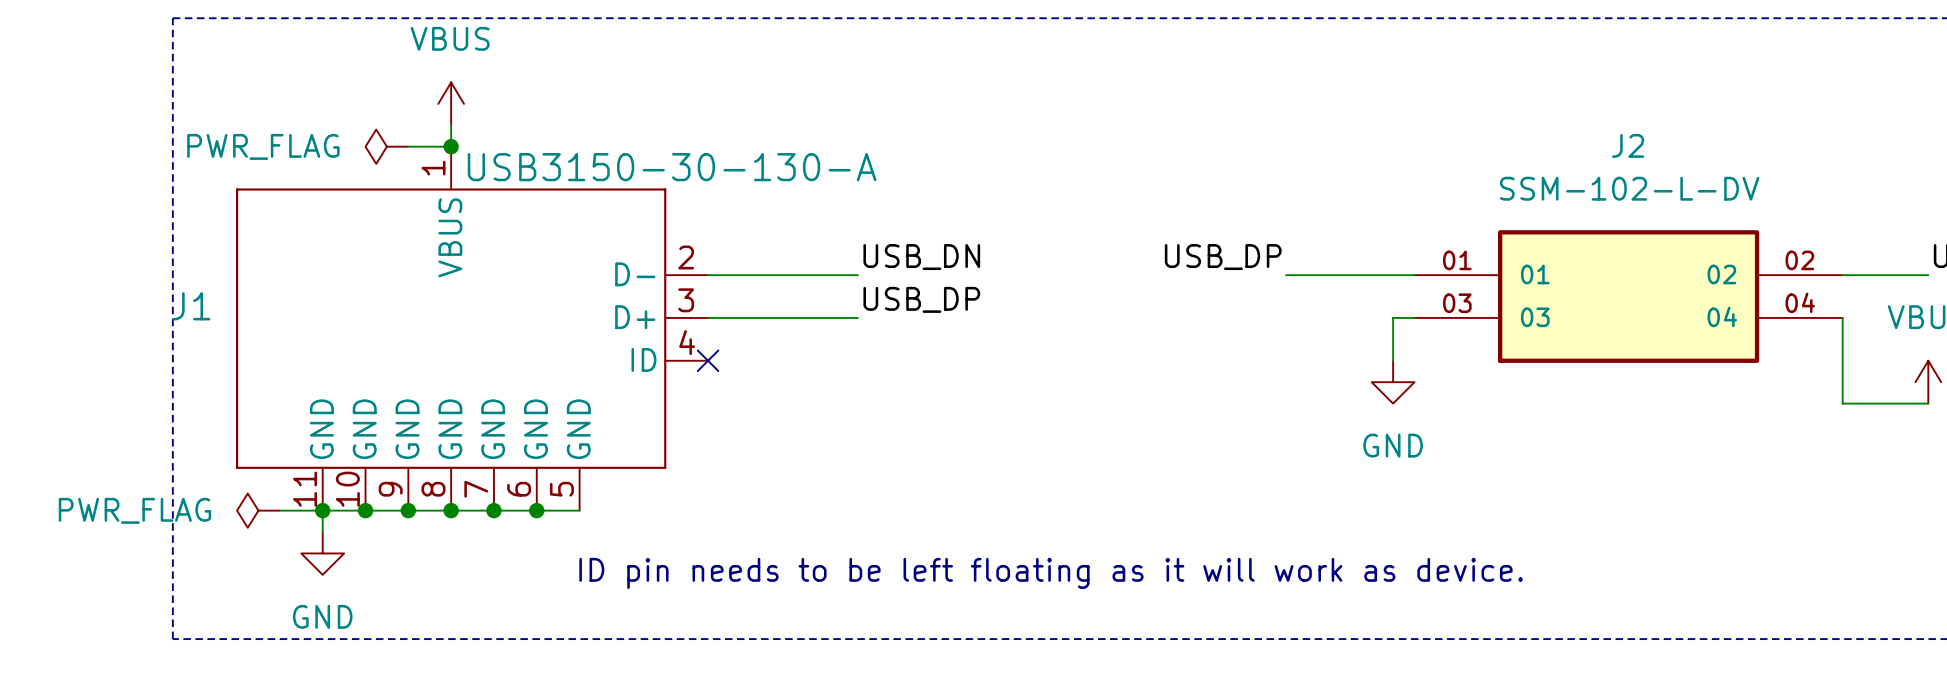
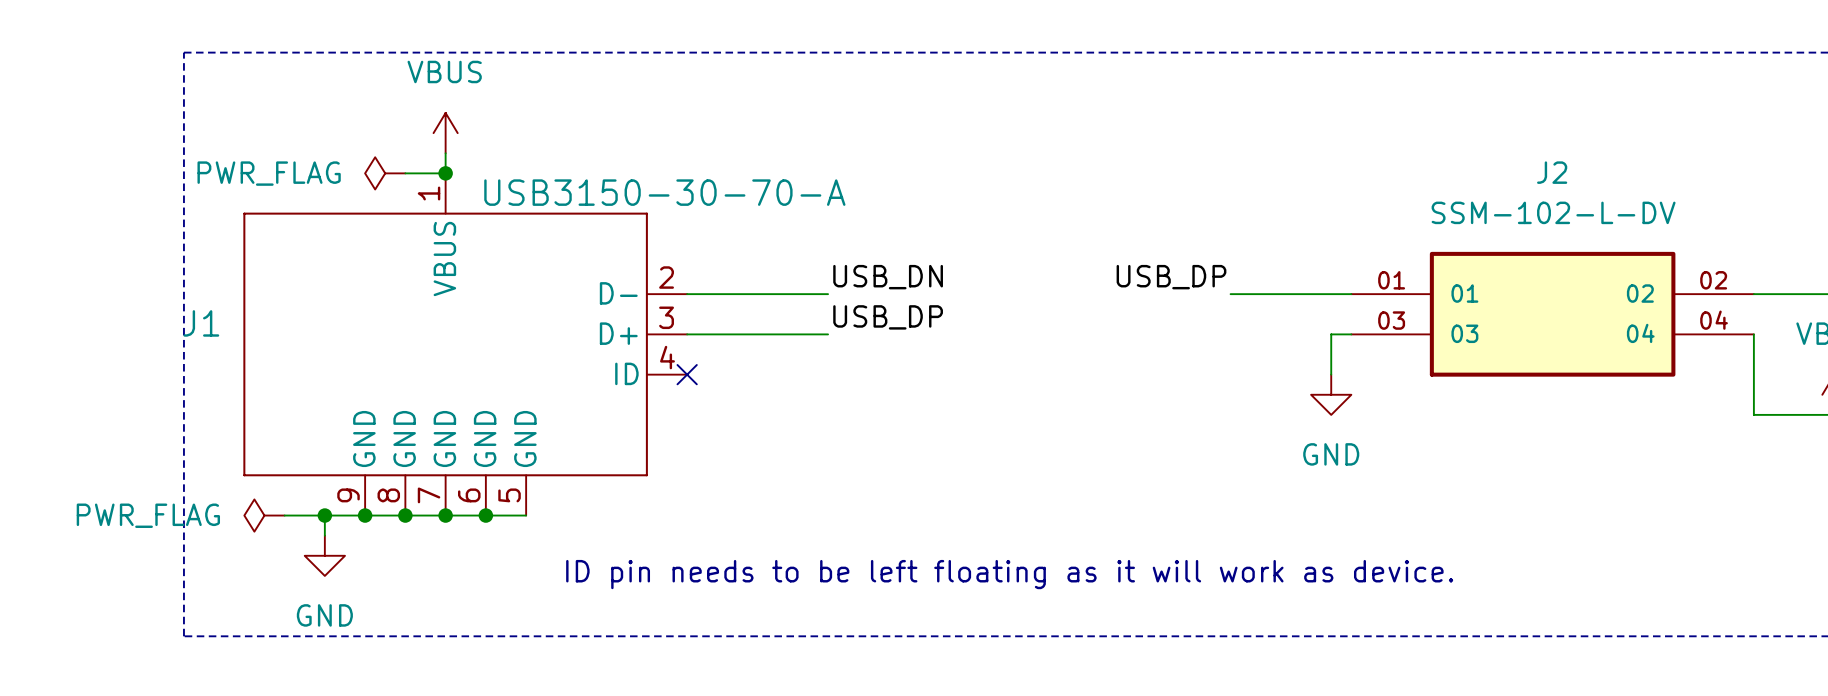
J1 symbol: [236, 146, 709, 511] -> [243, 173, 688, 516]
J1 value: USB3150-30-130-A (672, 167) -> USB3150-30-70-A (664, 192)
wire: (536, 510) (579, 510) -> none
junction: (536, 510) -> none

